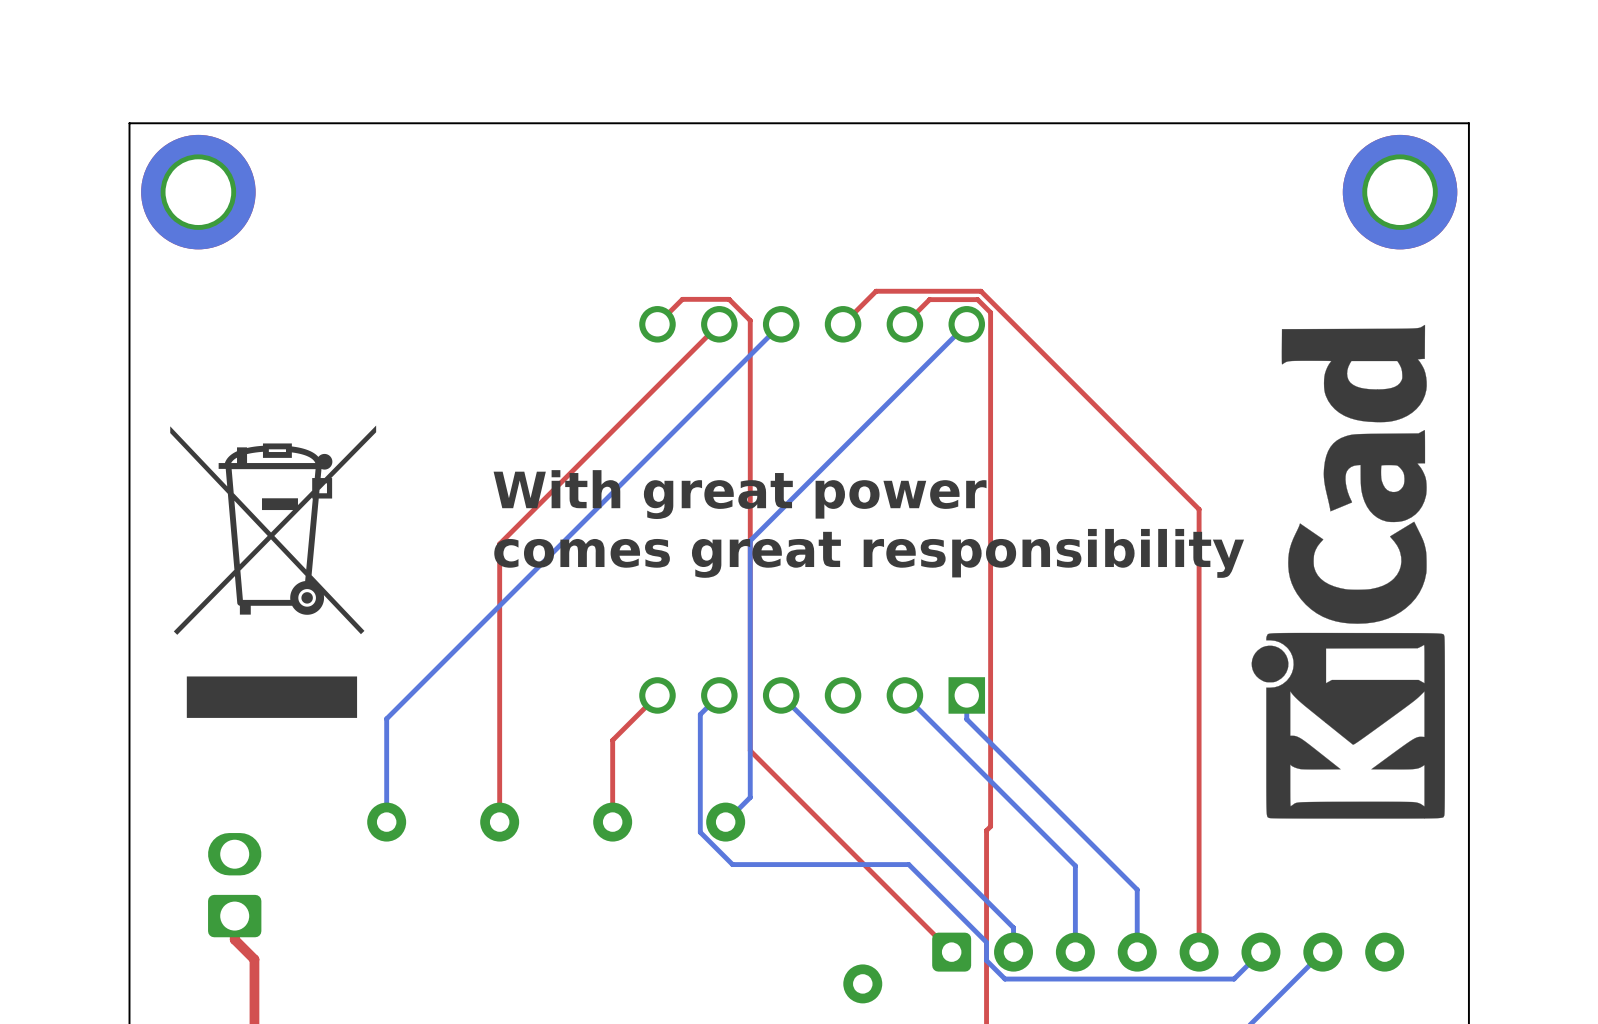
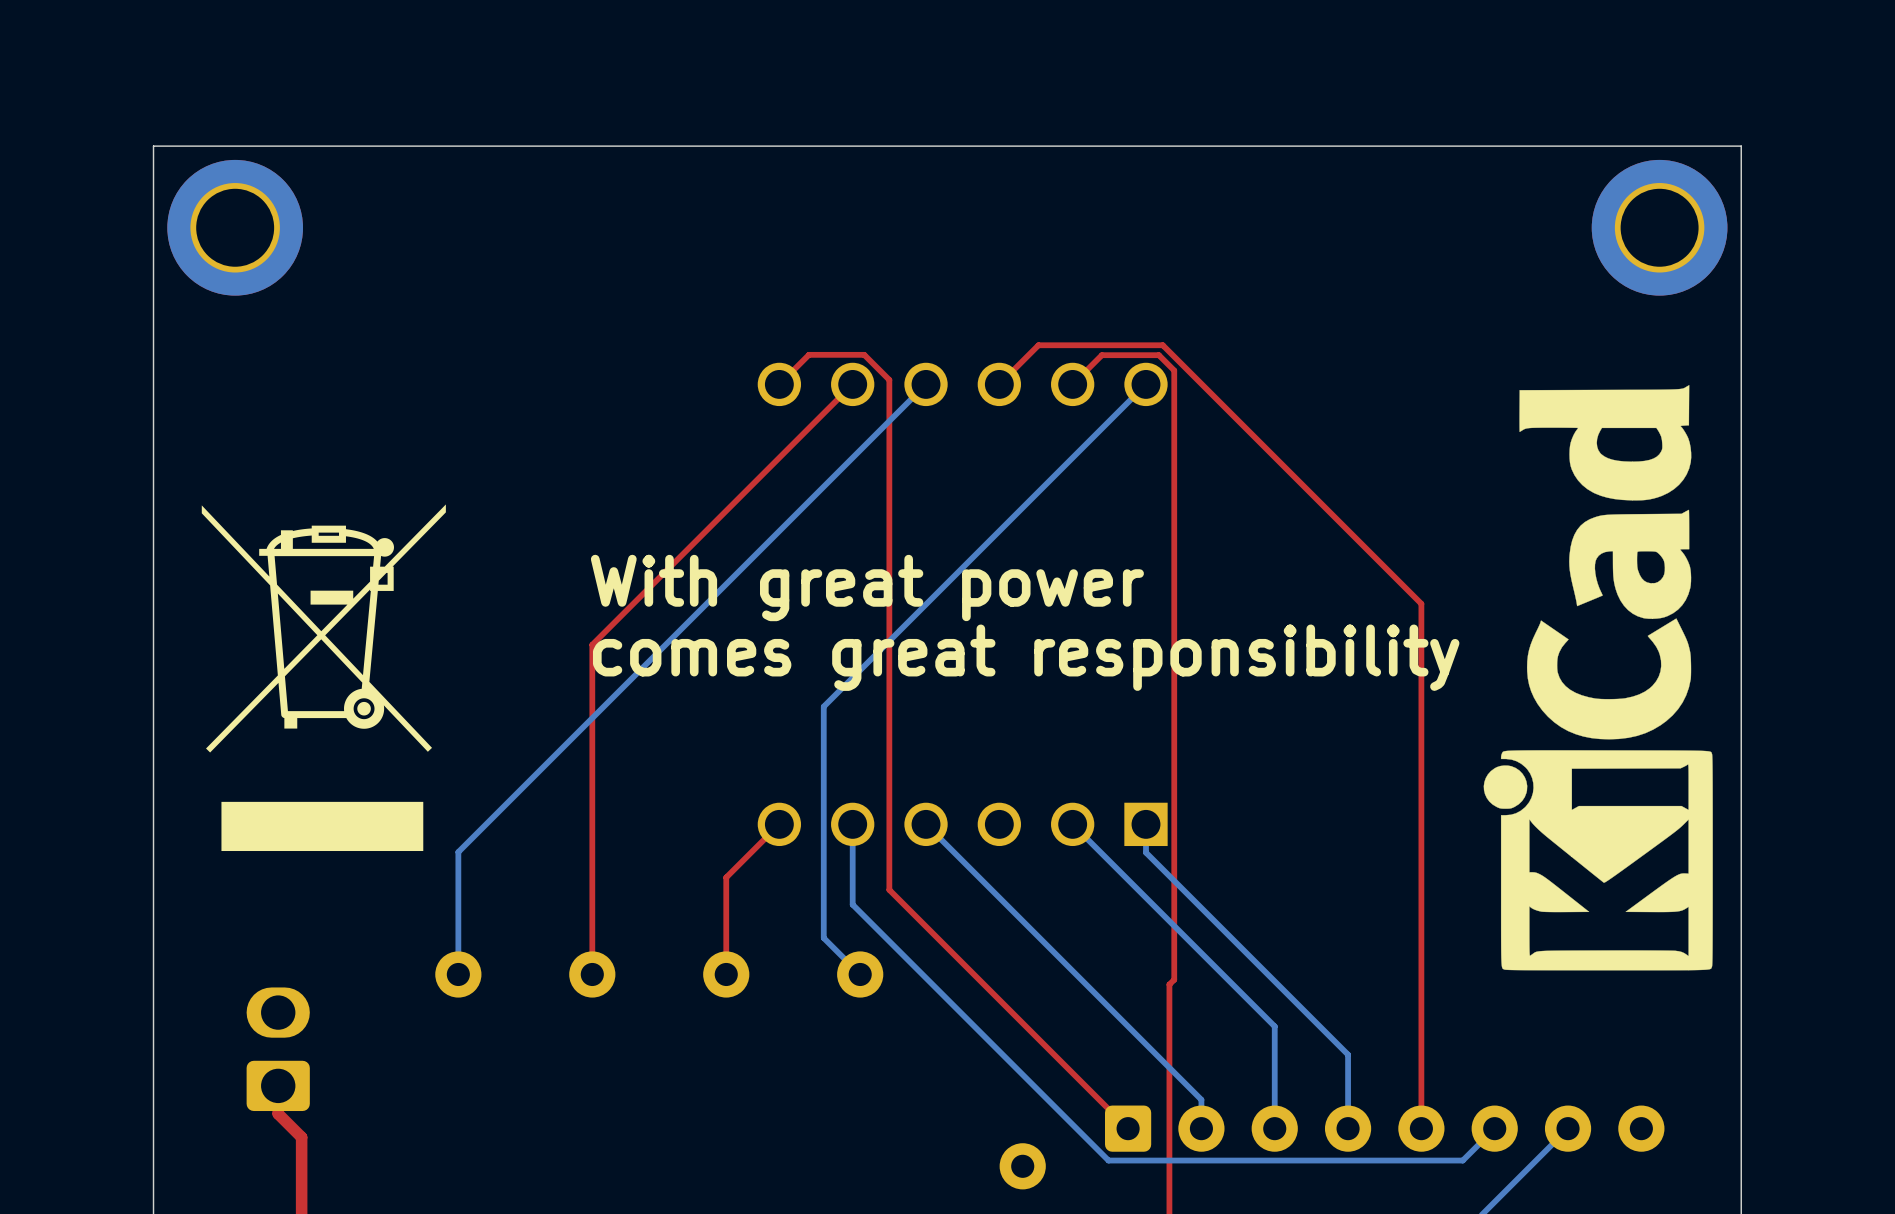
bottom track: (750, 540) (750, 797) (725, 822) -> (889, 641) (823, 706) (823, 938) (860, 974)
bottom track: (719, 695) (700, 714) (700, 832) (732, 864) (908, 864) (986, 942) (986, 960) (1004, 979) -> (852, 824) (852, 904) (1108, 1160) (1191, 1160)

